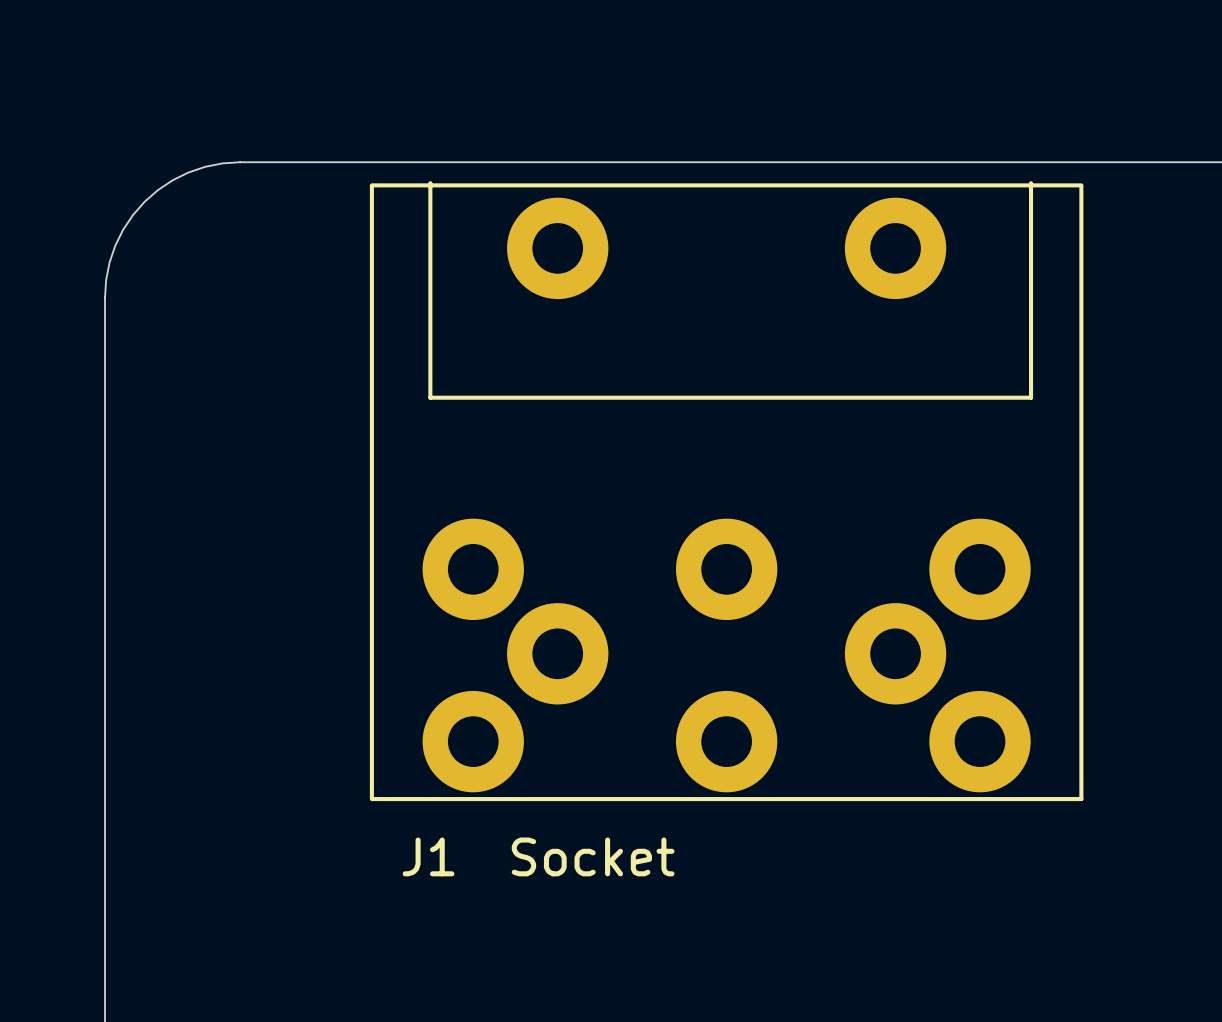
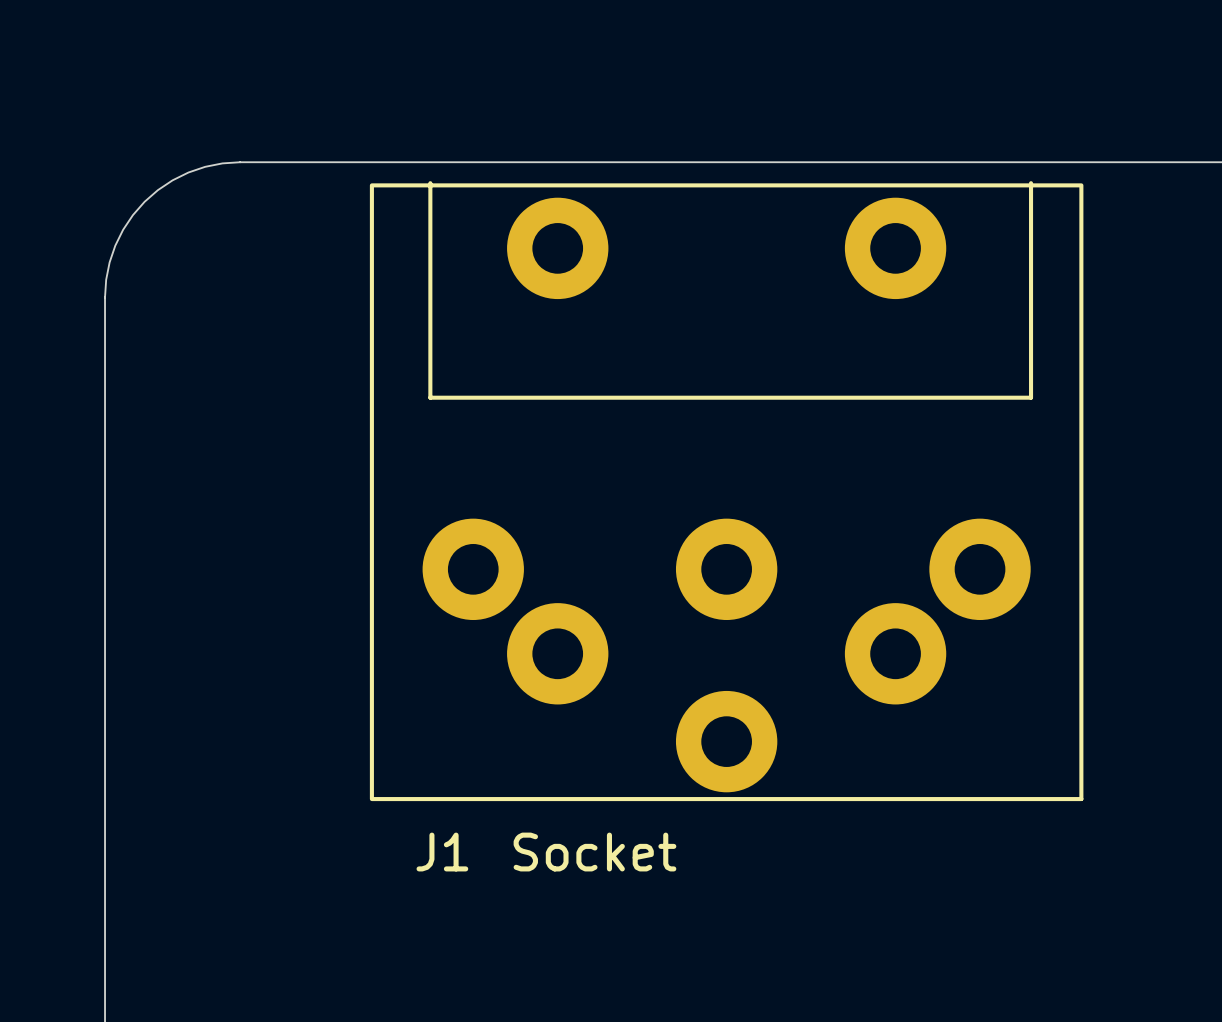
J1 footprint: [369, 181, 1084, 802] -> [369, 181, 1084, 802]

